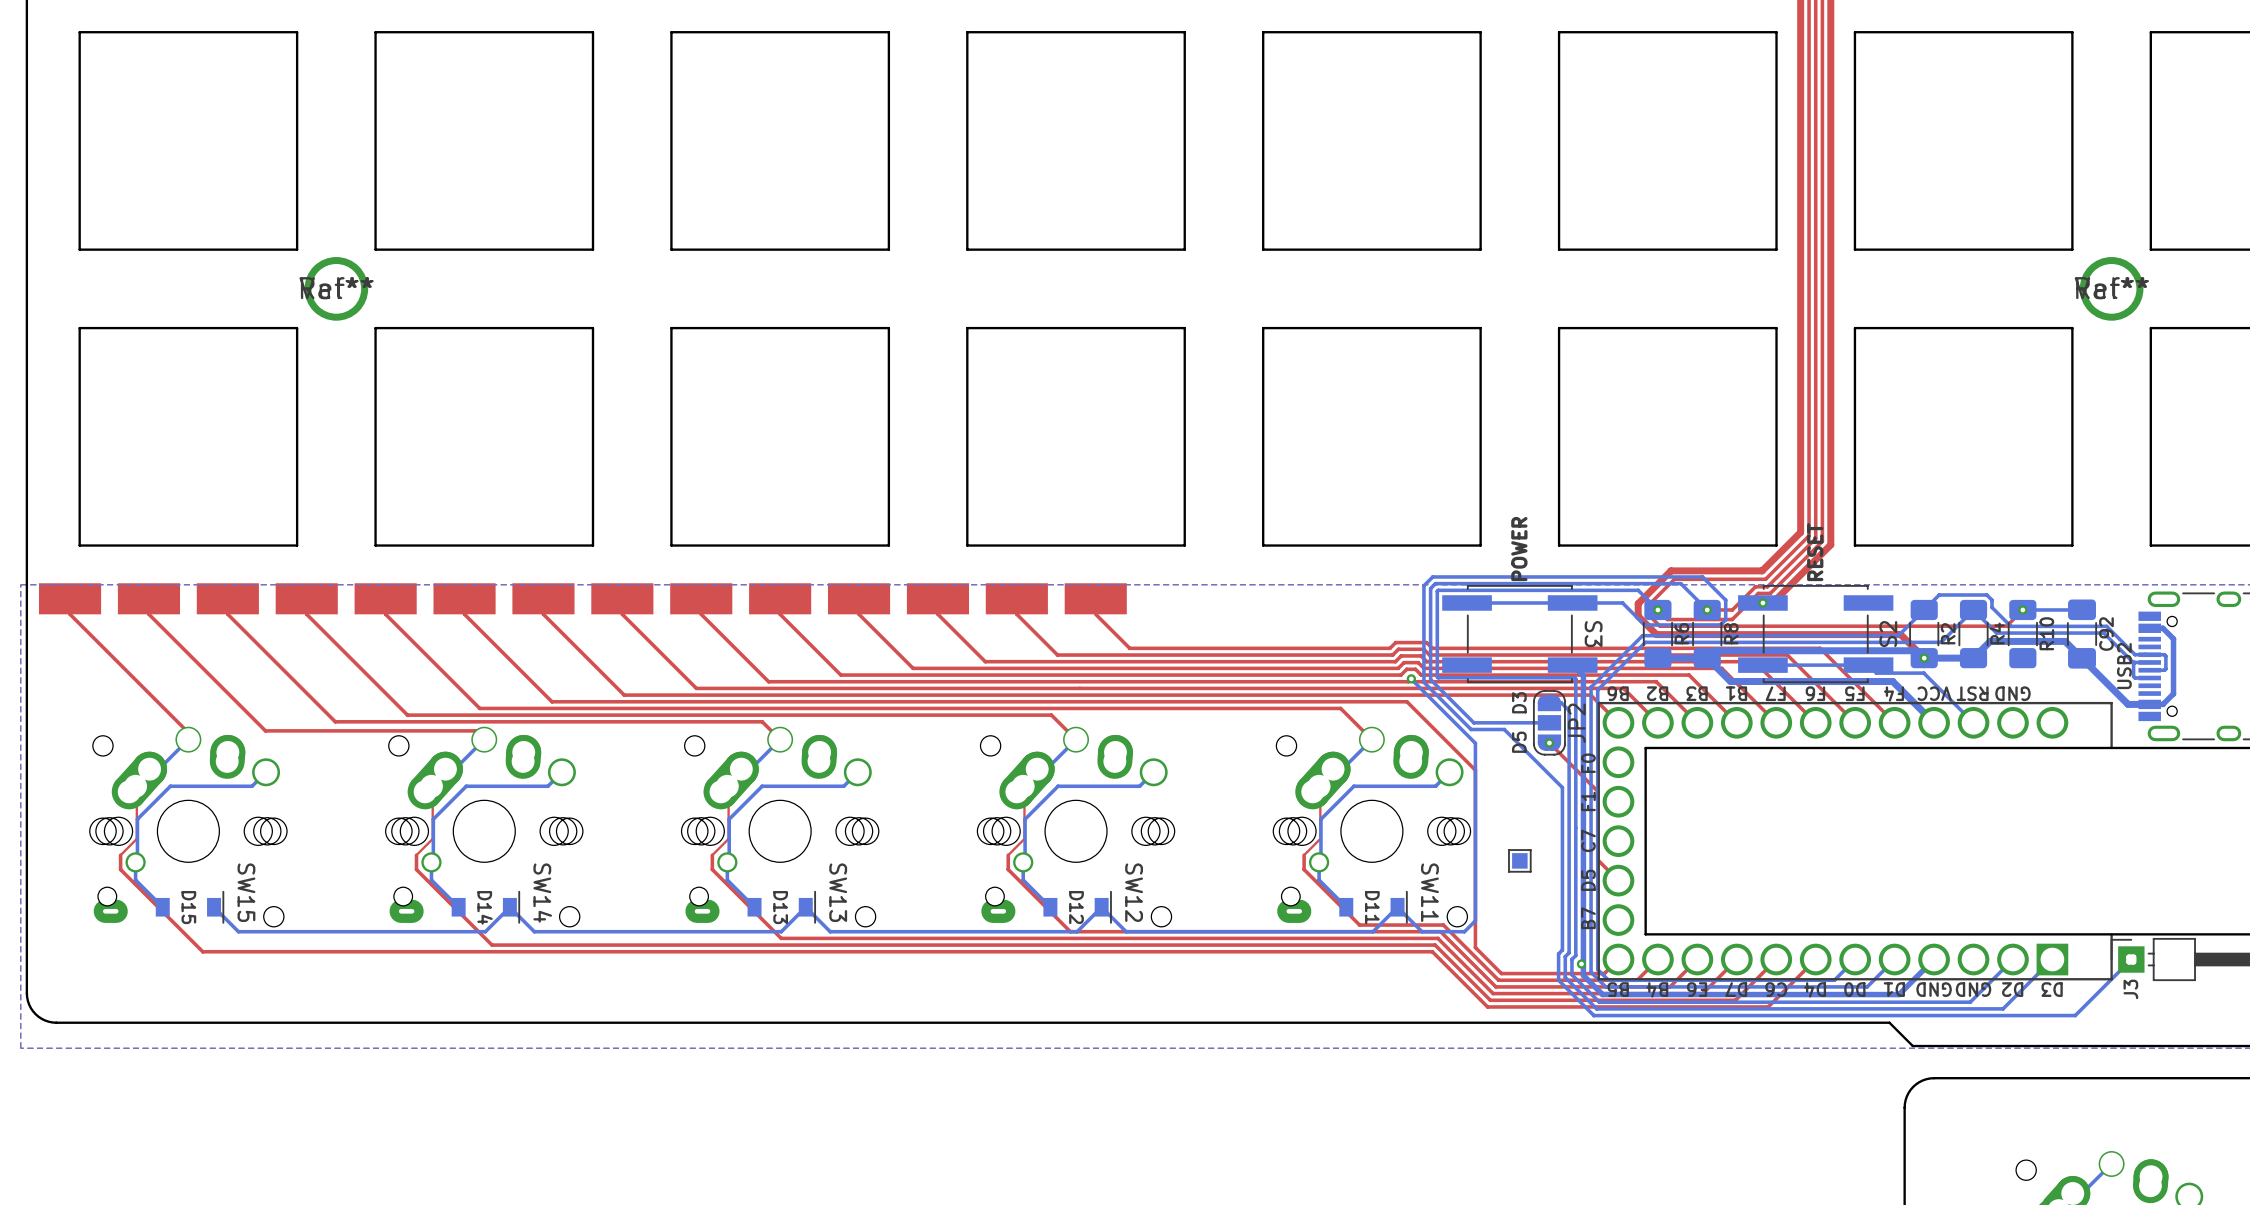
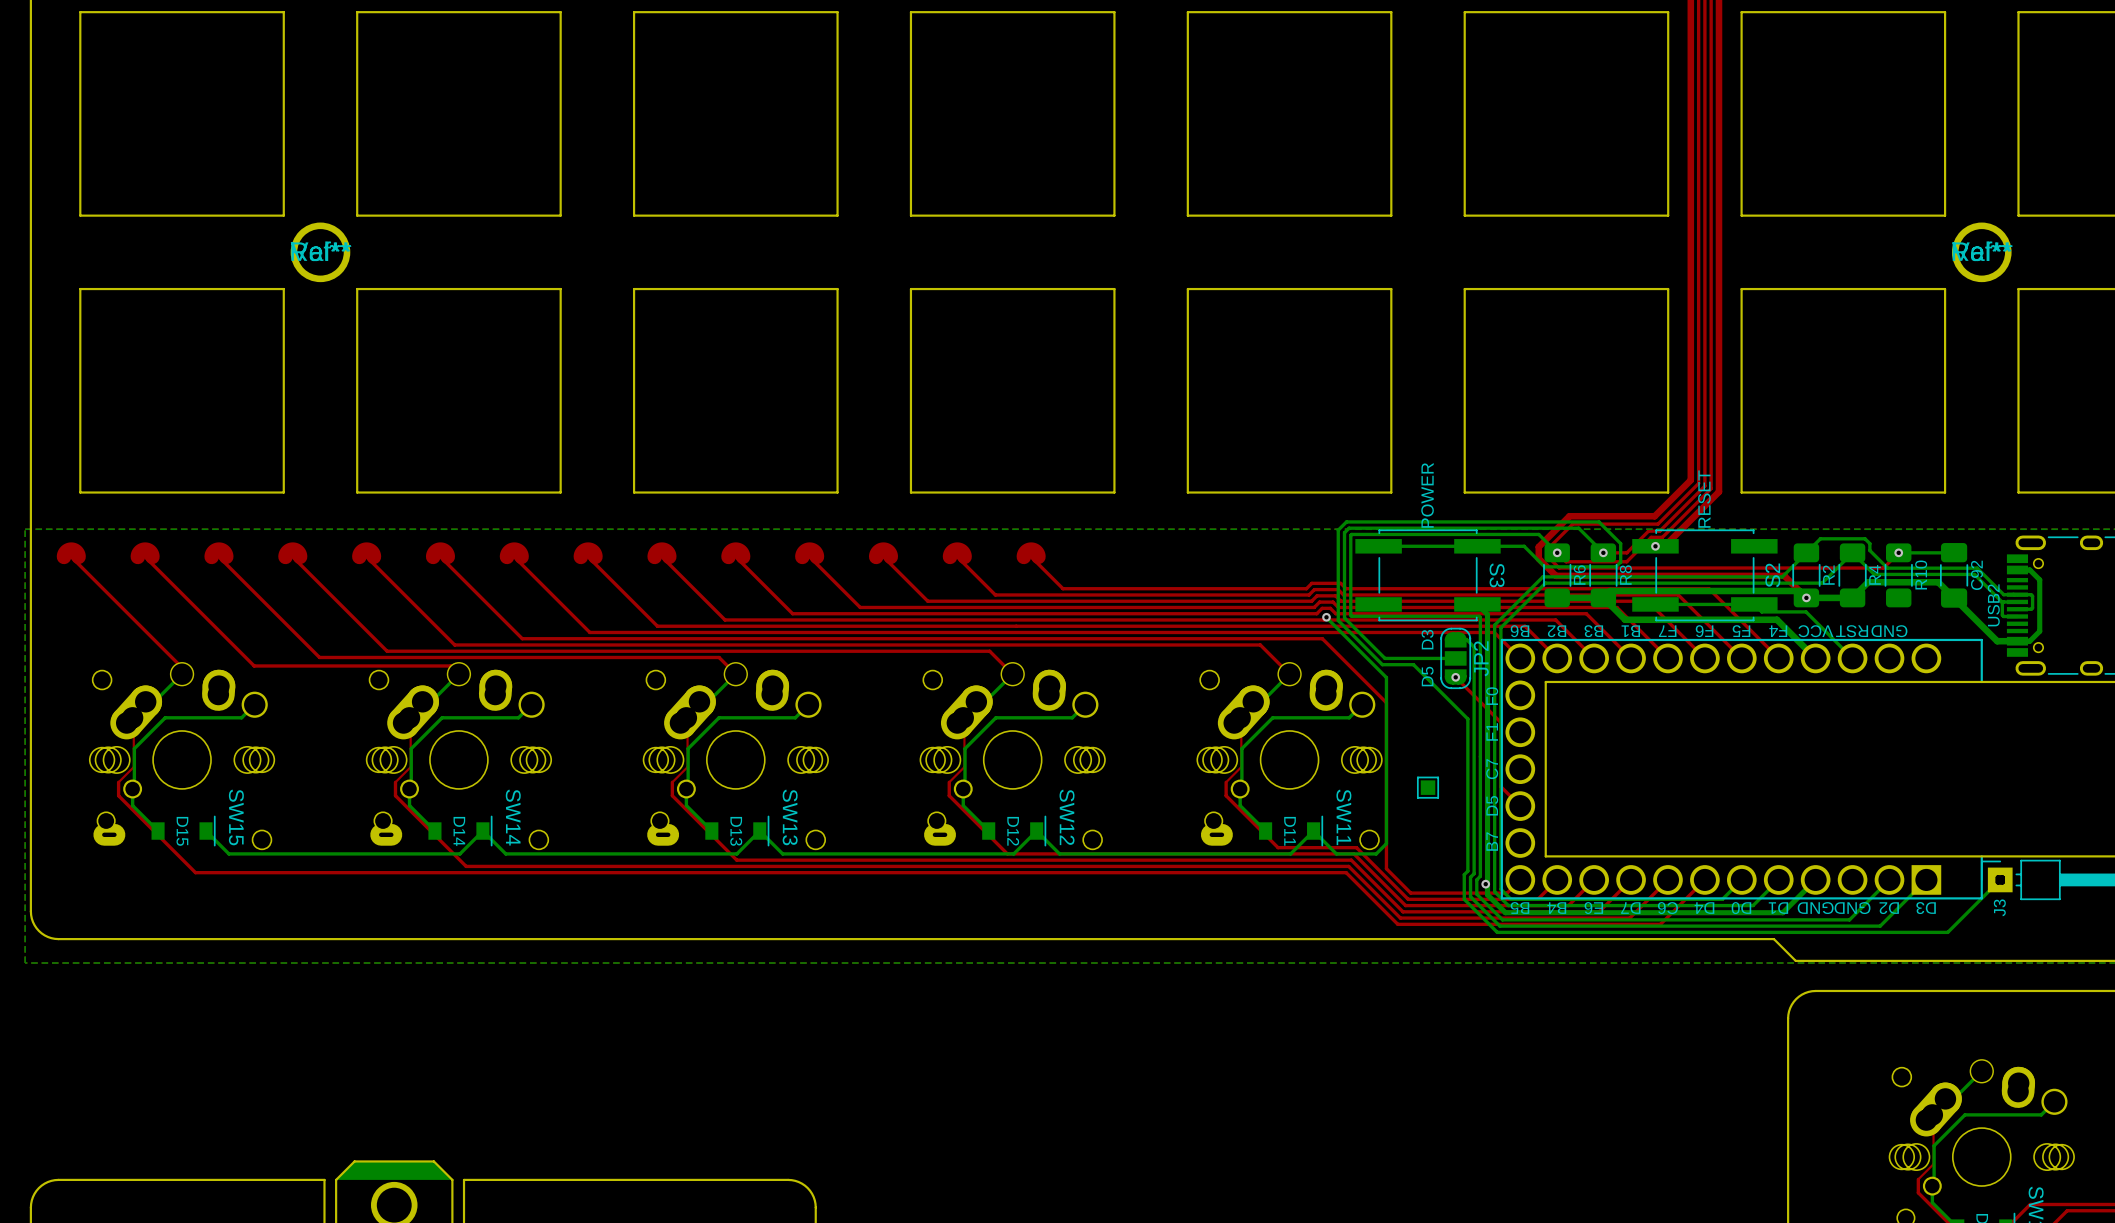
part footprint: [38, 583, 102, 615] -> [56, 542, 86, 565]
part footprint: [117, 583, 181, 615] -> [130, 542, 160, 565]
part footprint: [196, 583, 259, 615] -> [204, 542, 234, 565]
part footprint: [275, 583, 338, 615] -> [278, 542, 308, 565]
part footprint: [354, 583, 417, 615] -> [352, 542, 382, 565]
part footprint: [433, 583, 496, 615] -> [425, 542, 456, 565]
part footprint: [512, 583, 575, 615] -> [499, 542, 529, 565]
part footprint: [591, 583, 654, 615] -> [573, 542, 603, 565]
part footprint: [670, 583, 733, 615] -> [647, 542, 677, 565]
part footprint: [749, 583, 812, 615] -> [721, 542, 751, 565]
part footprint: [827, 583, 891, 615] -> [795, 542, 825, 565]
part footprint: [906, 583, 970, 615] -> [868, 542, 899, 565]
part footprint: [985, 583, 1048, 615] -> [942, 542, 972, 565]
part footprint: [1064, 583, 1127, 615] -> [1016, 542, 1046, 565]

